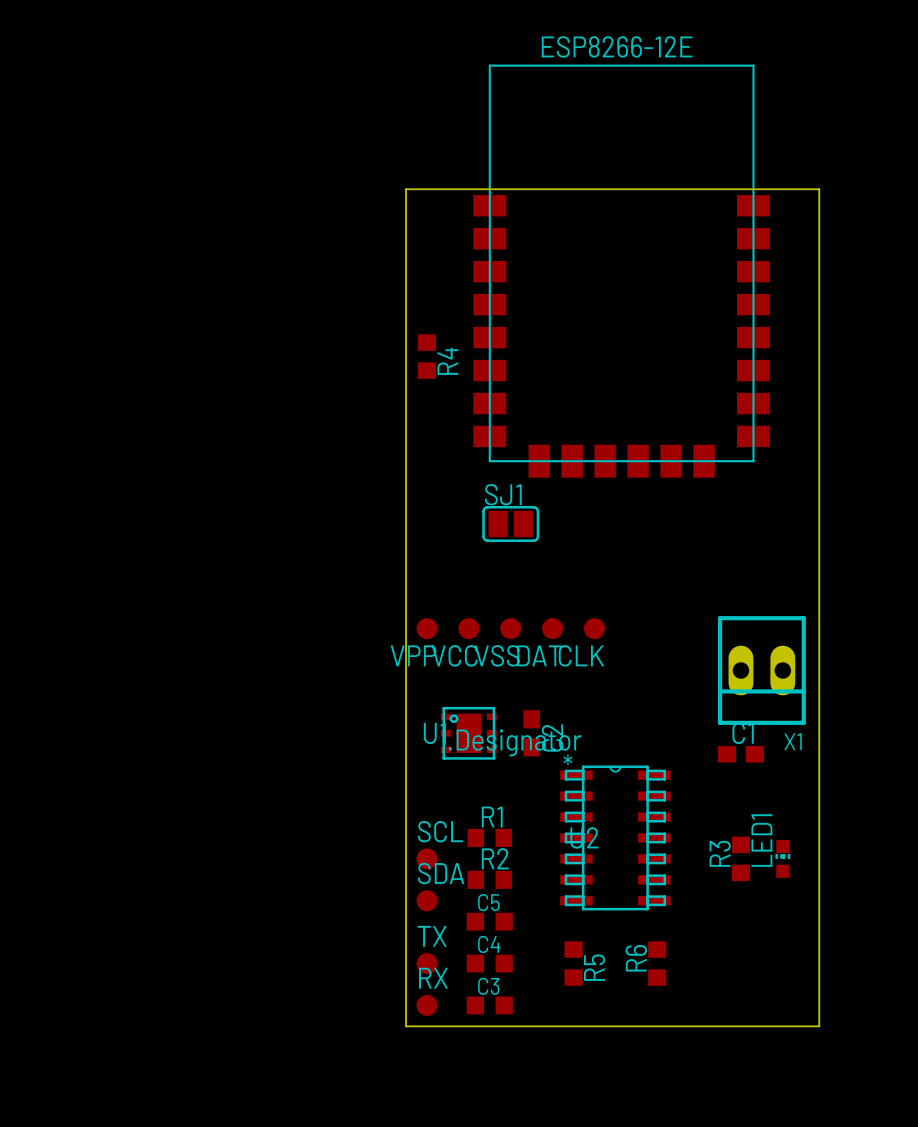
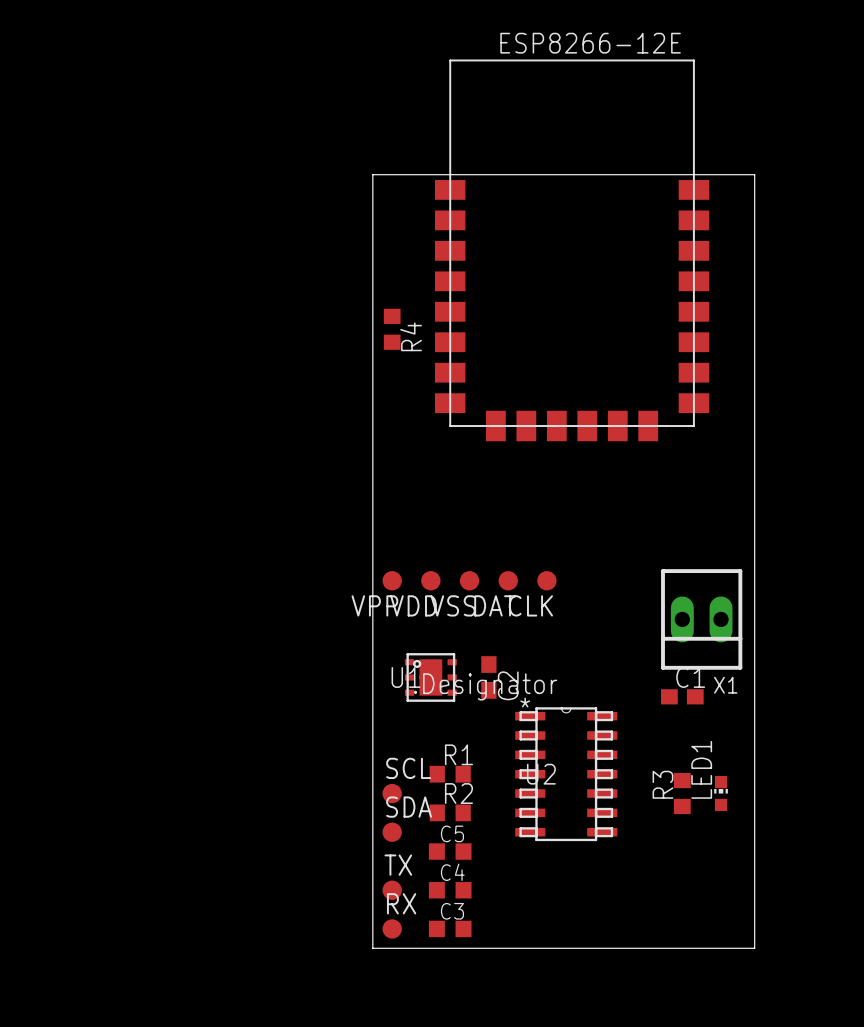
SJ1: (510, 523) -> none
VCC name: VCC (454, 655) -> VDD (413, 605)
R5: (573, 963) -> none
R6: (657, 963) -> none

